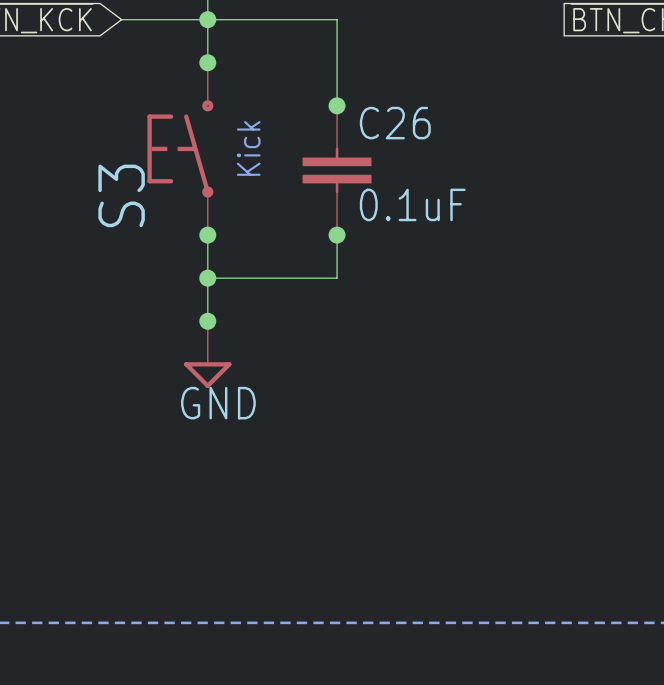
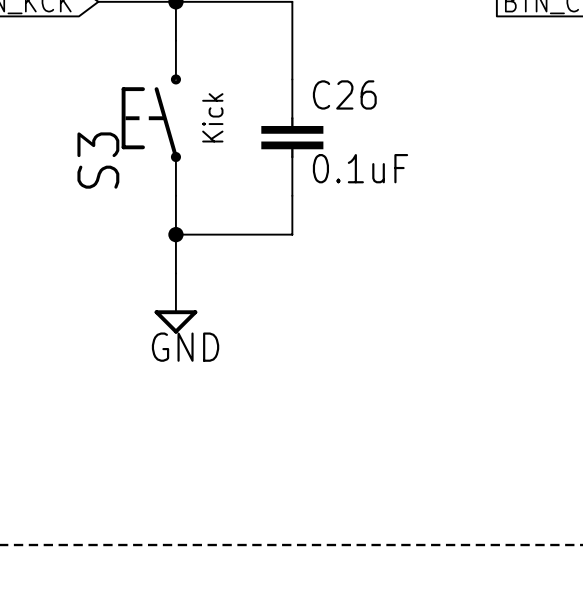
junction: (207, 62) -> none
junction: (337, 105) -> none
junction: (207, 235) -> none
junction: (337, 235) -> none
junction: (207, 321) -> none

